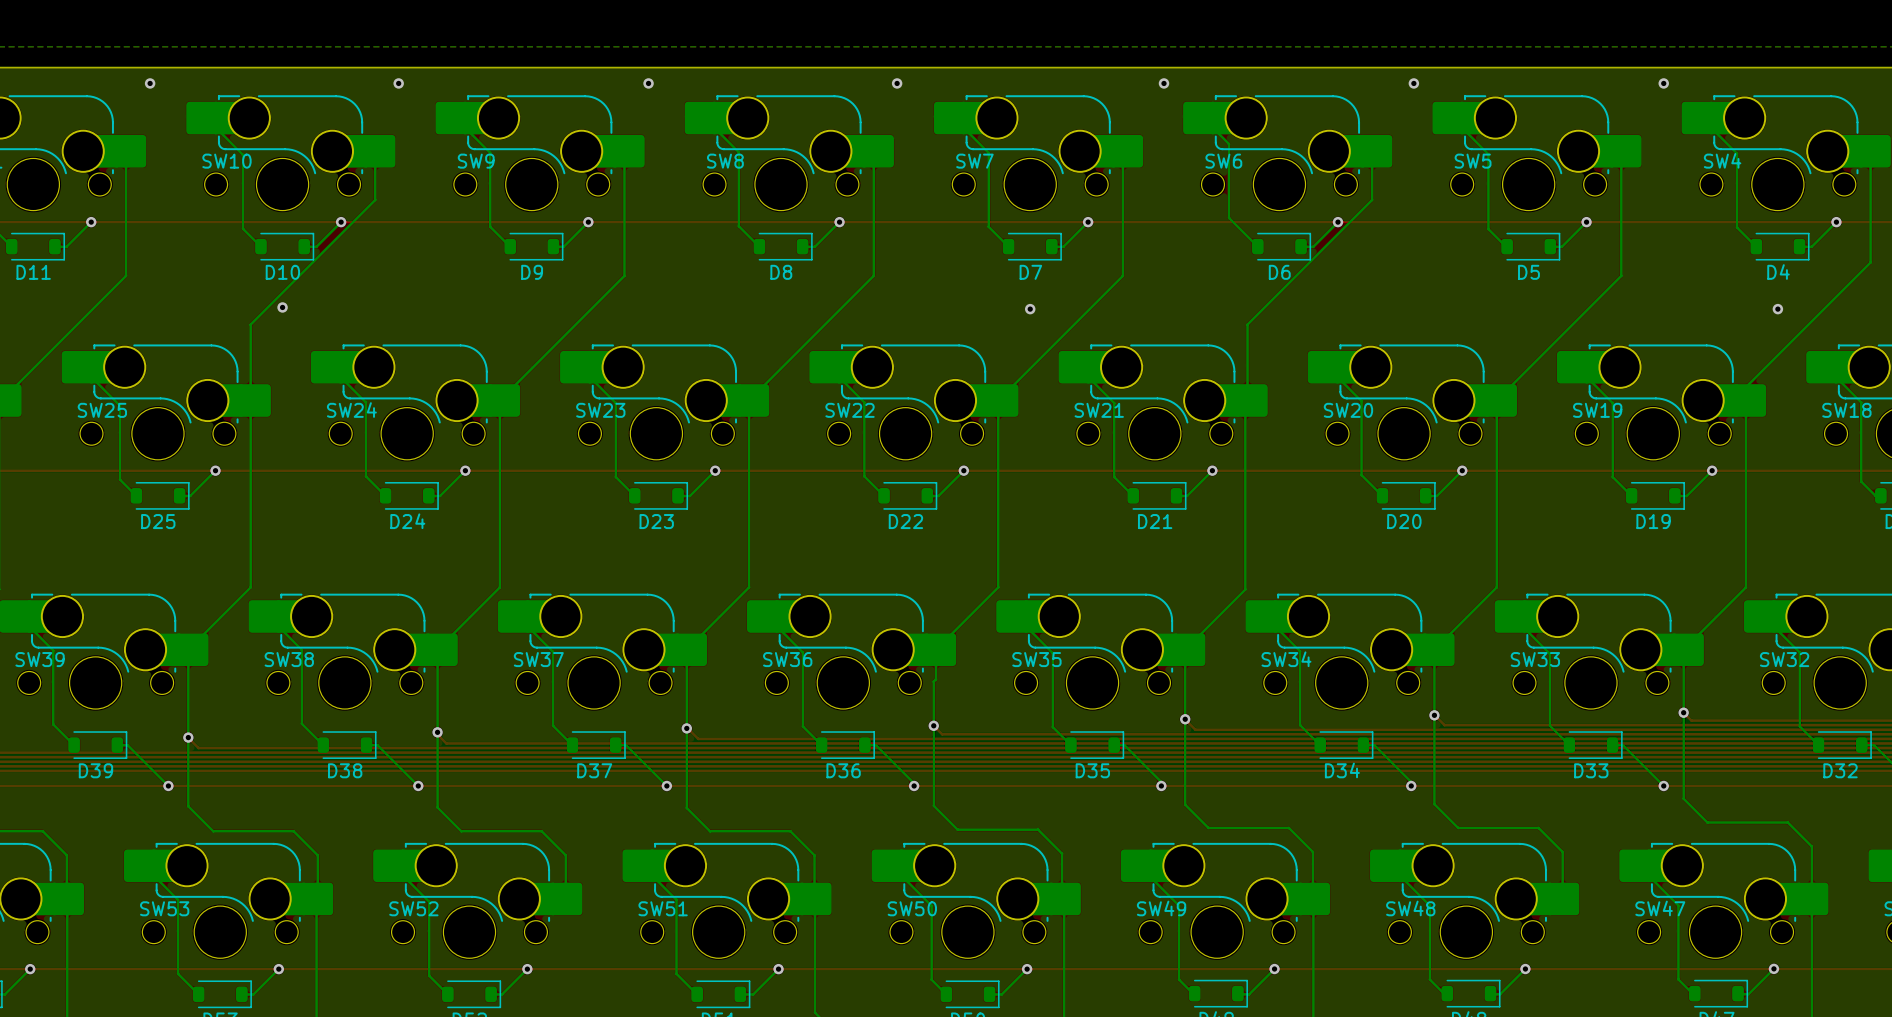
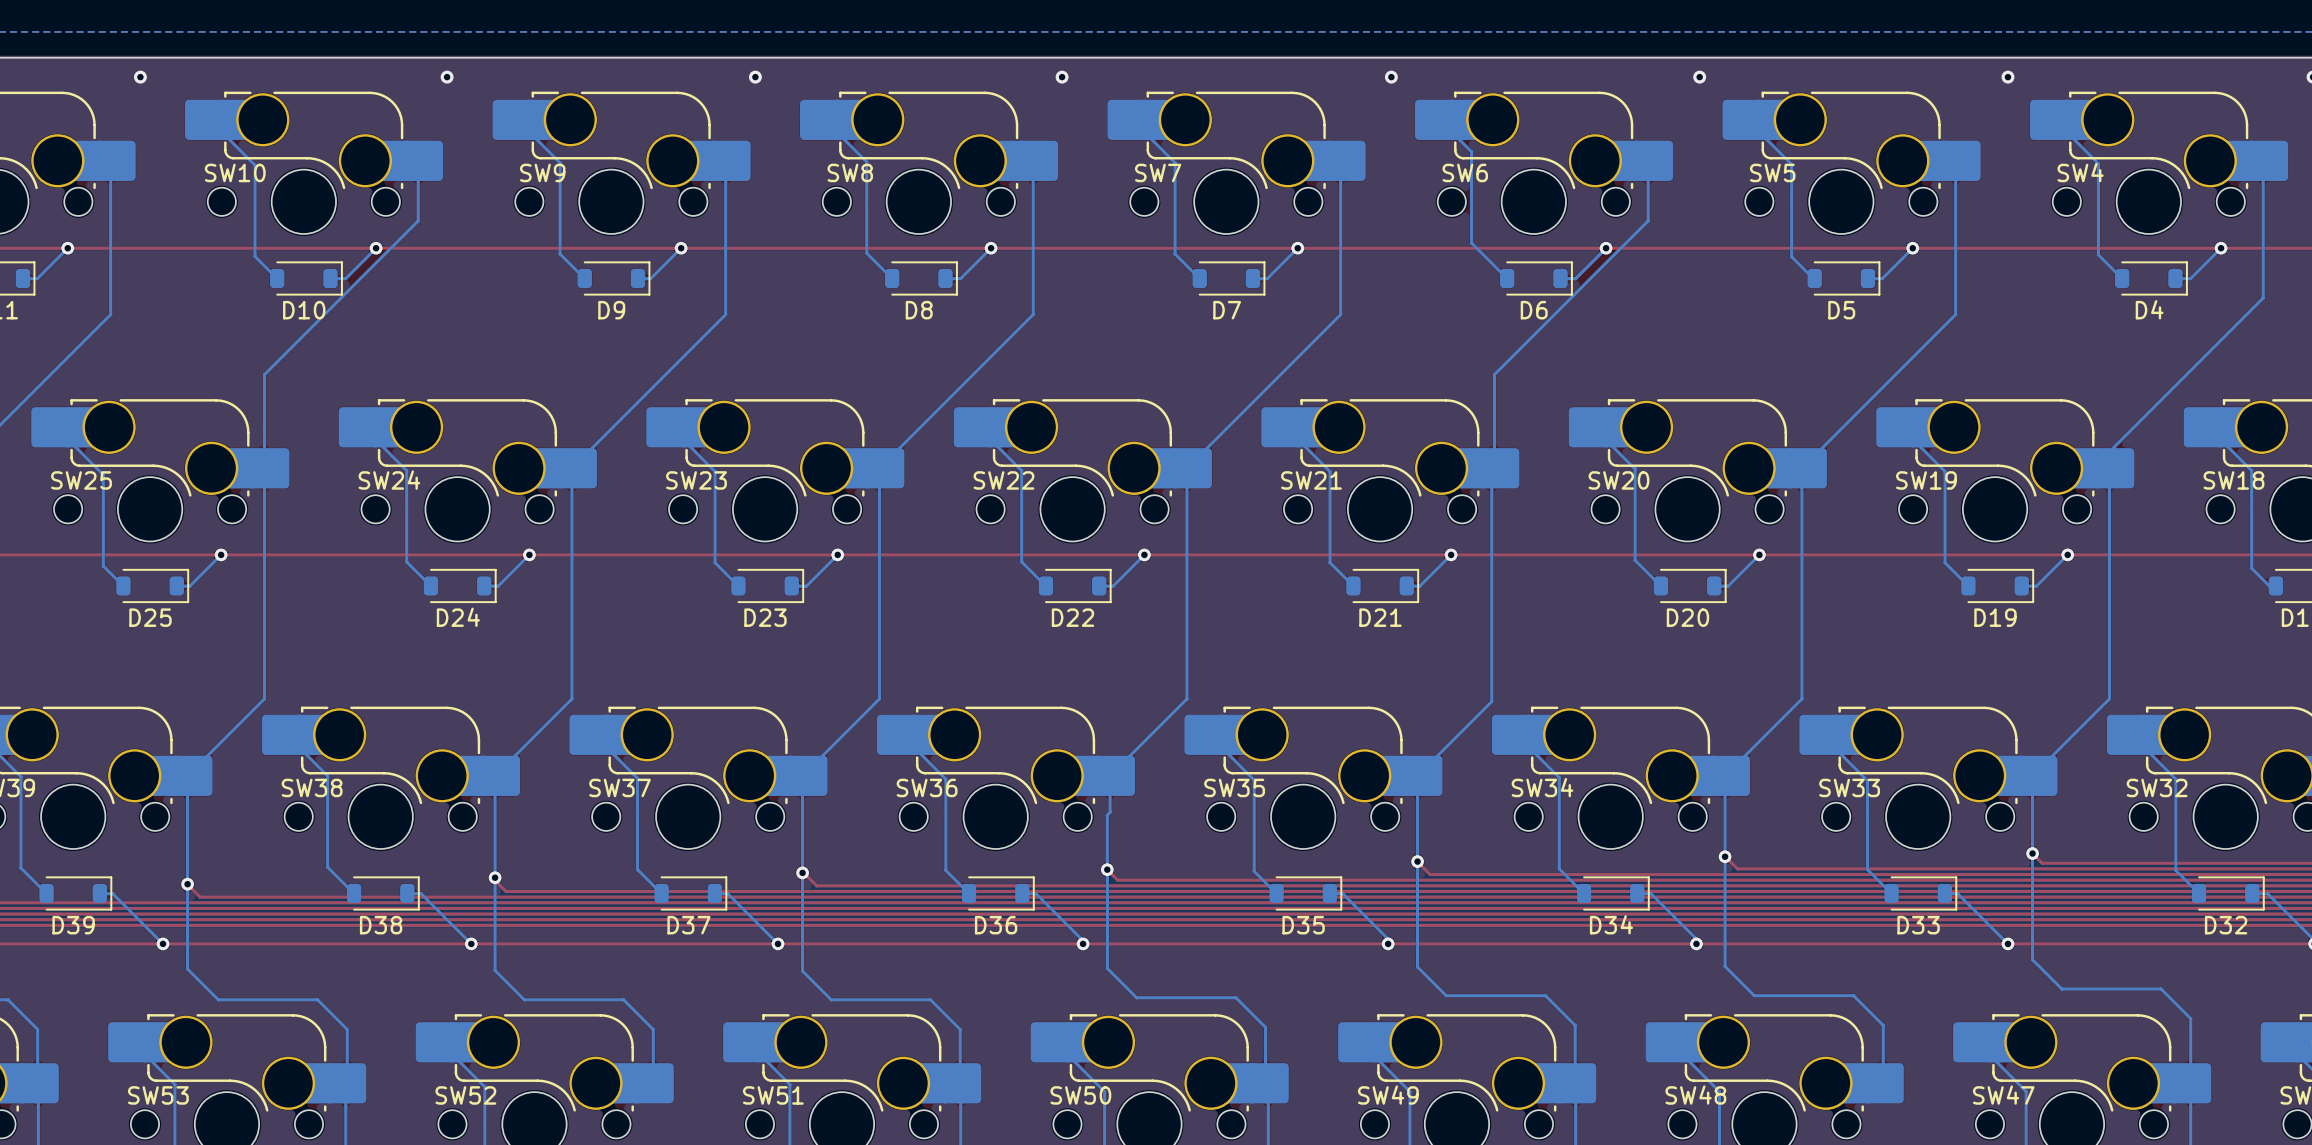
via: (282, 307) -> none
via: (1030, 309) -> none
via: (1777, 309) -> none

